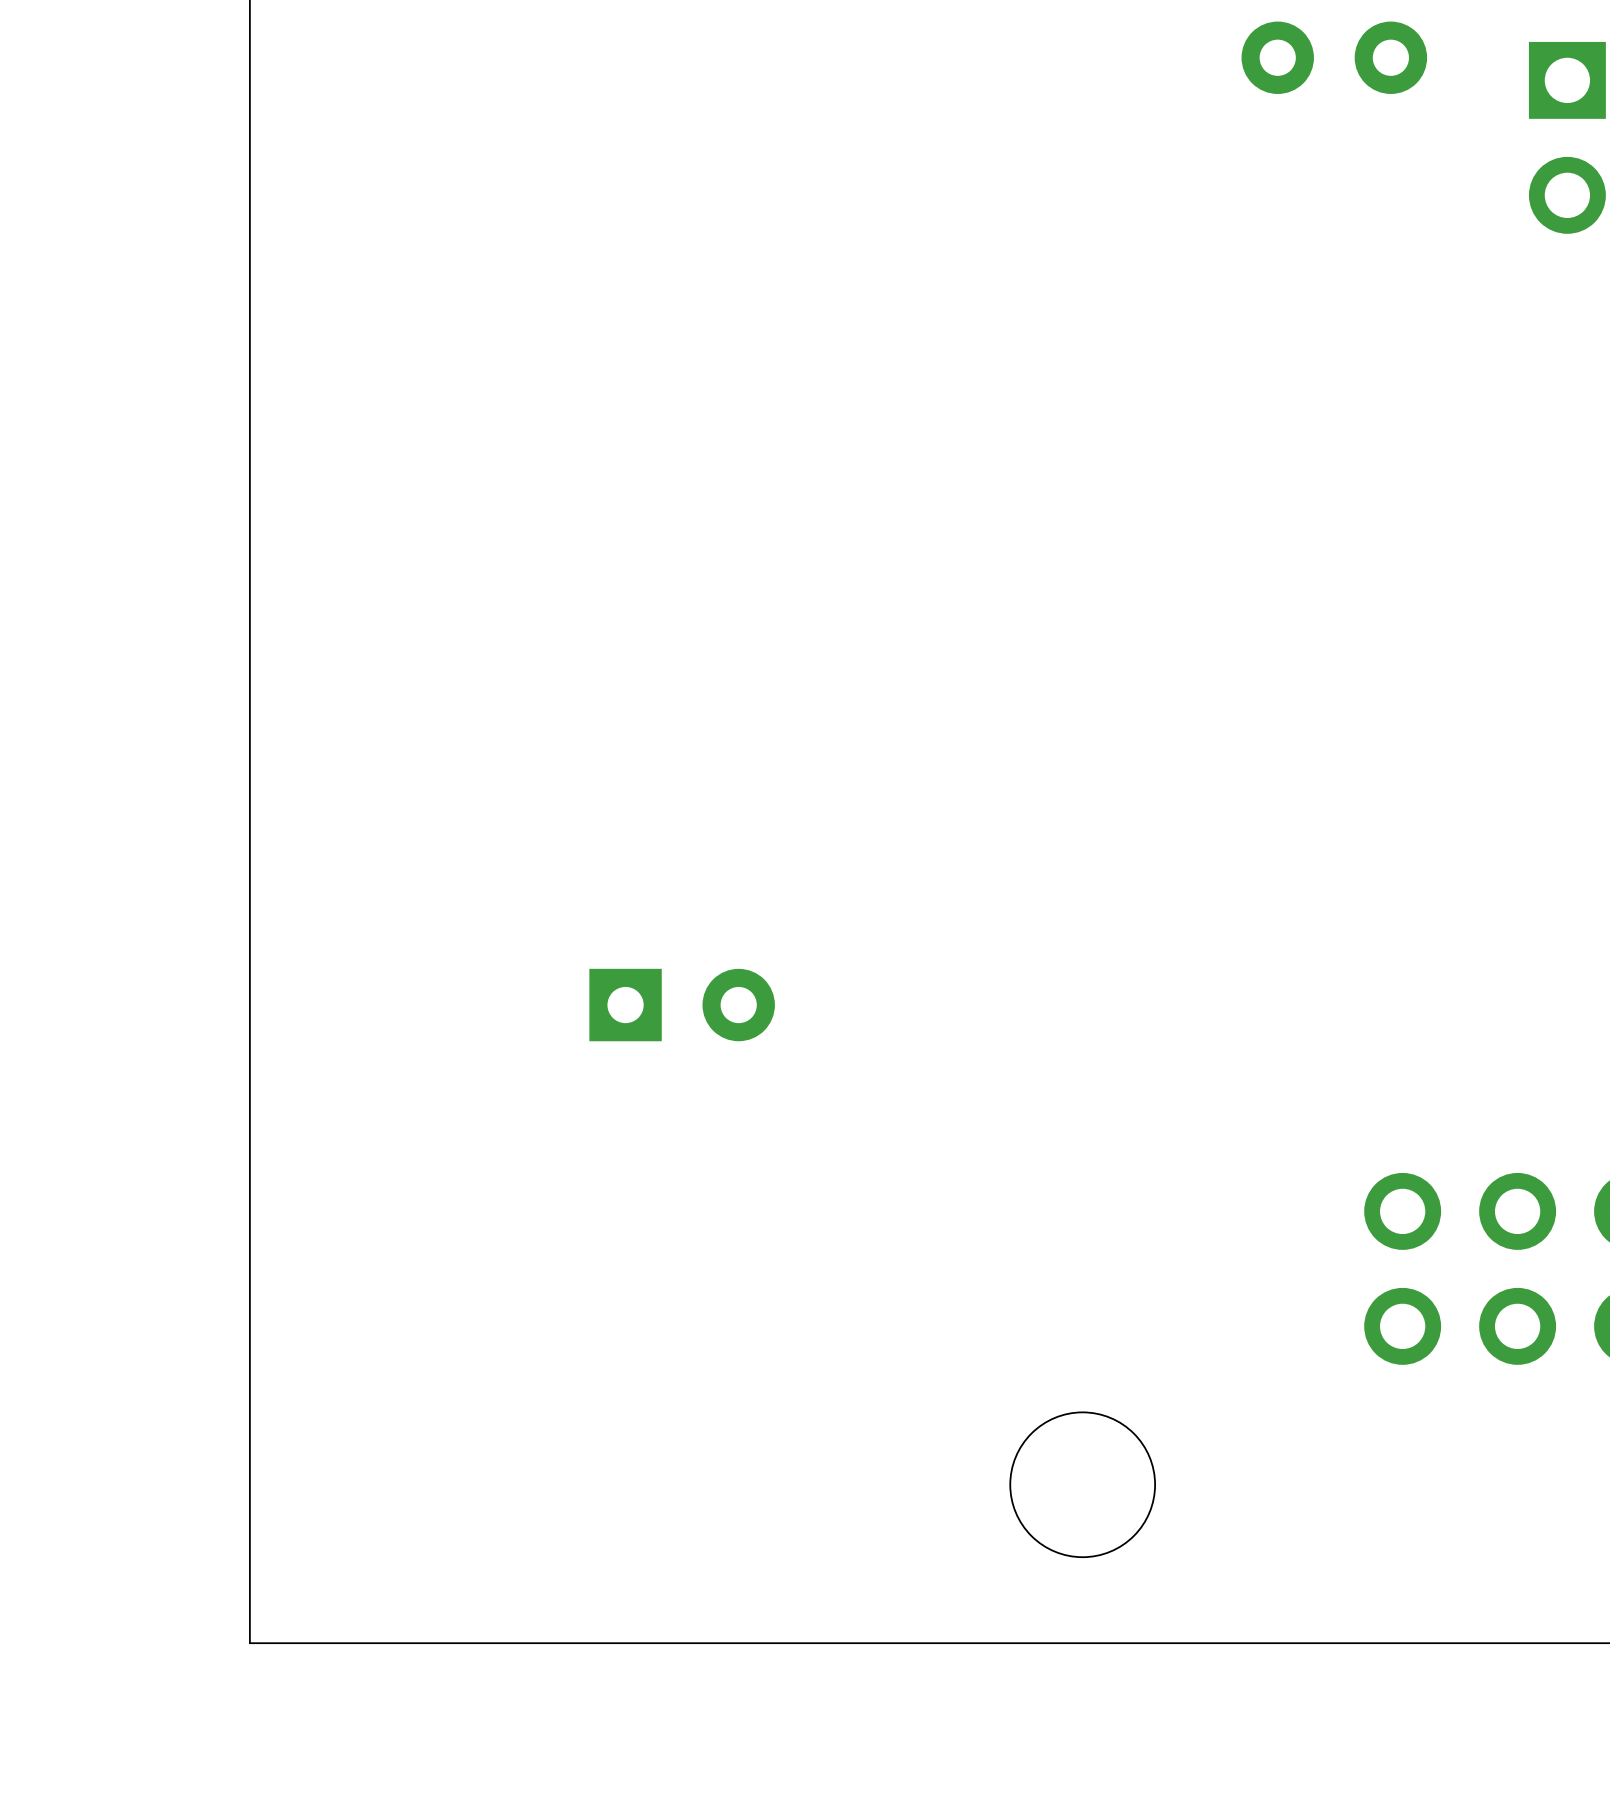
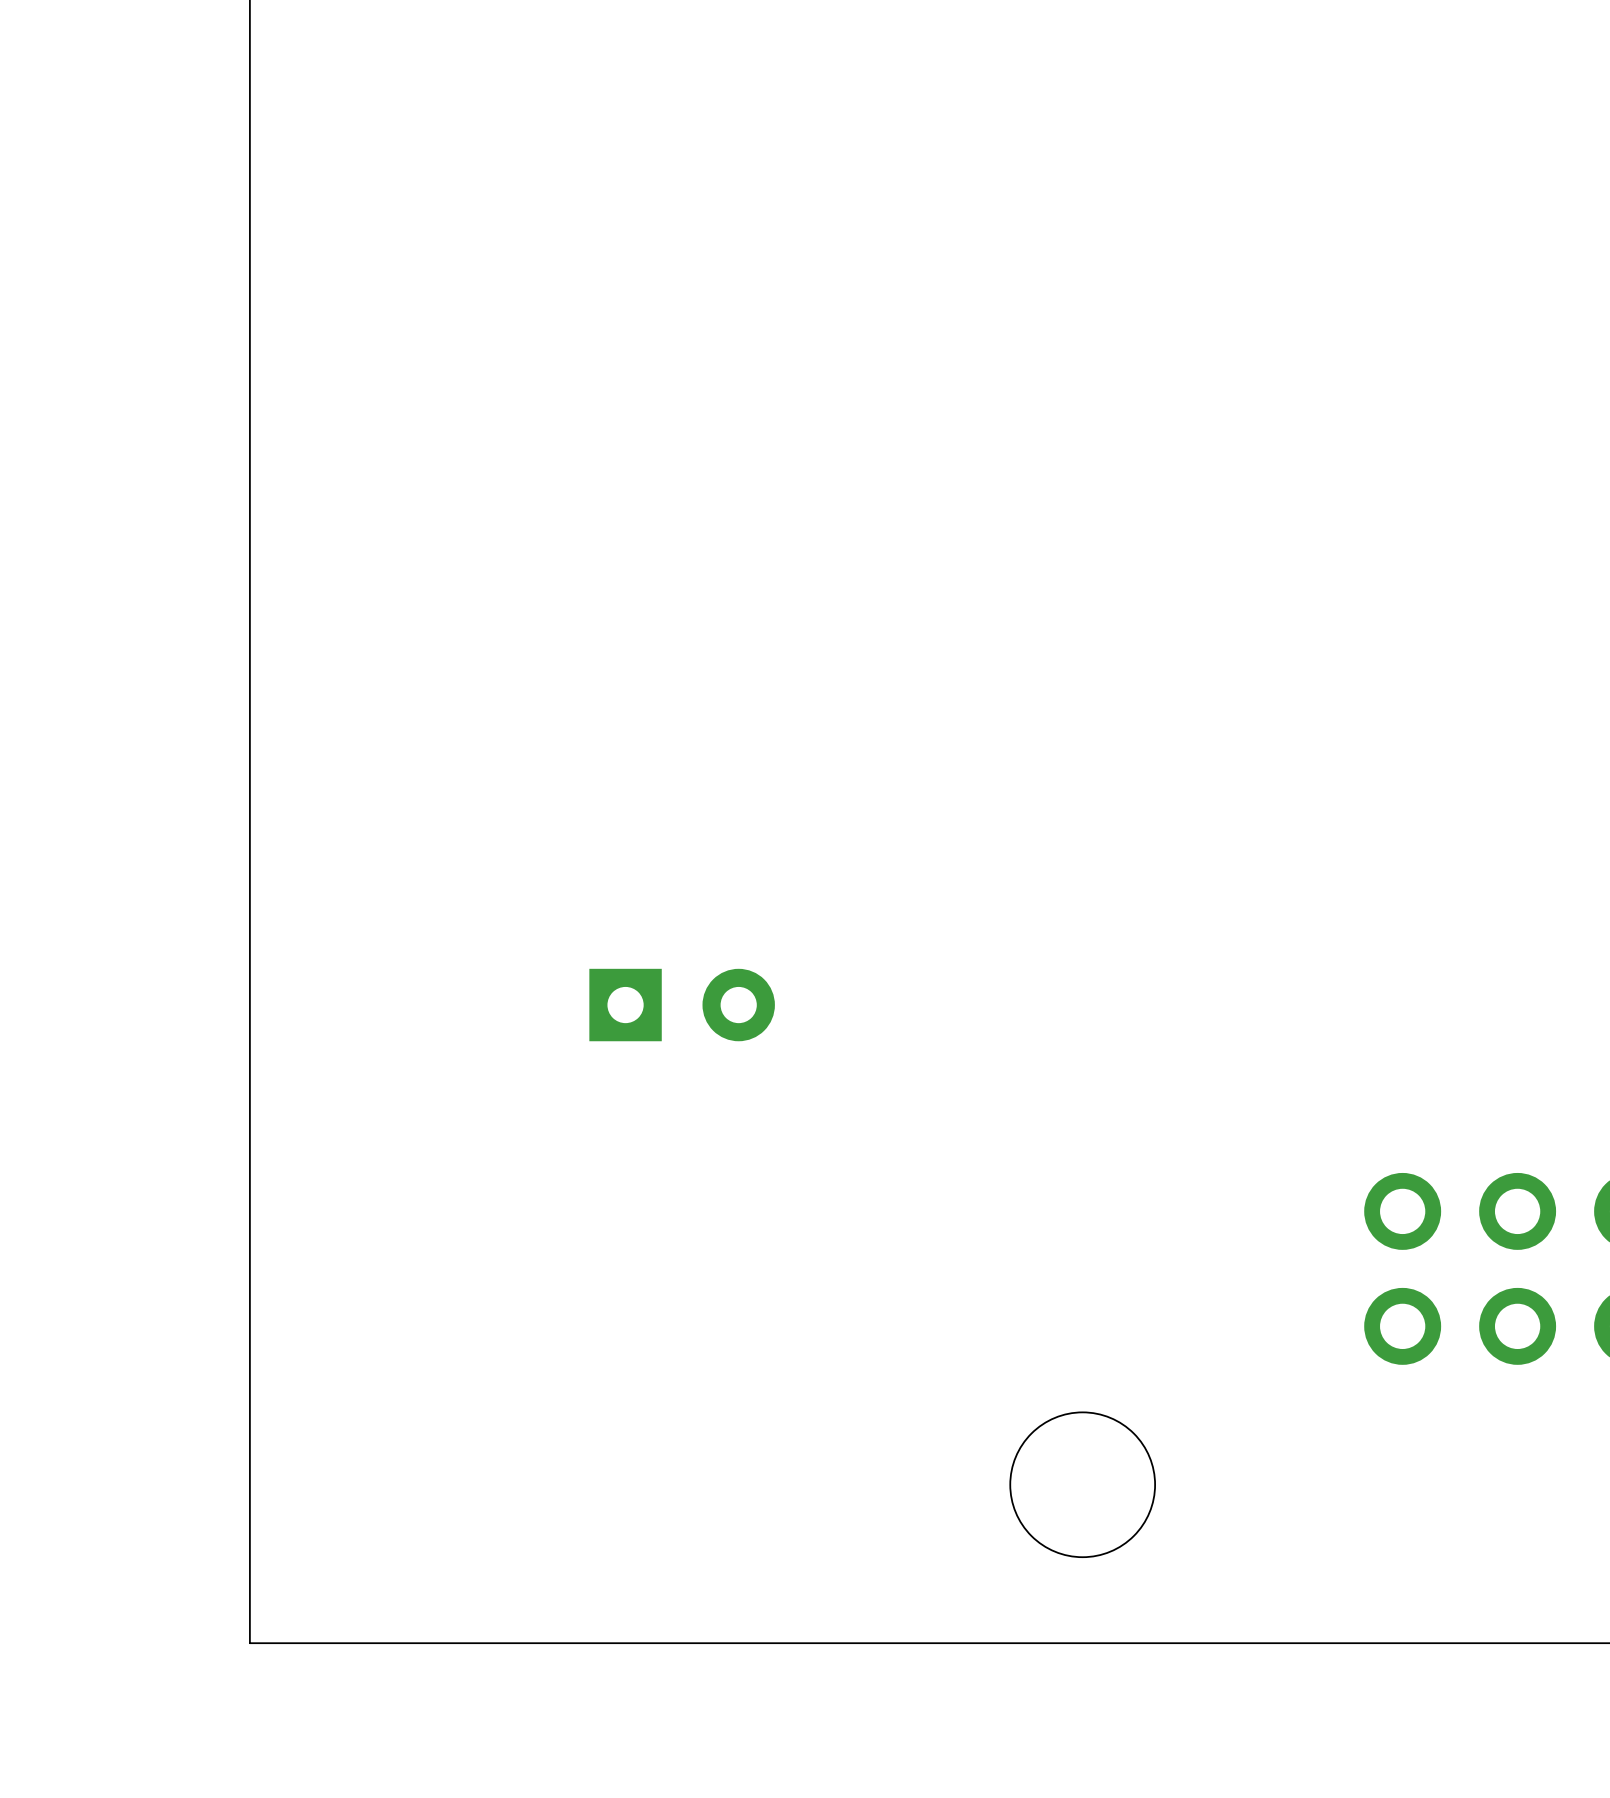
part: (1334, 57) -> none
part: (1567, 137) -> none

